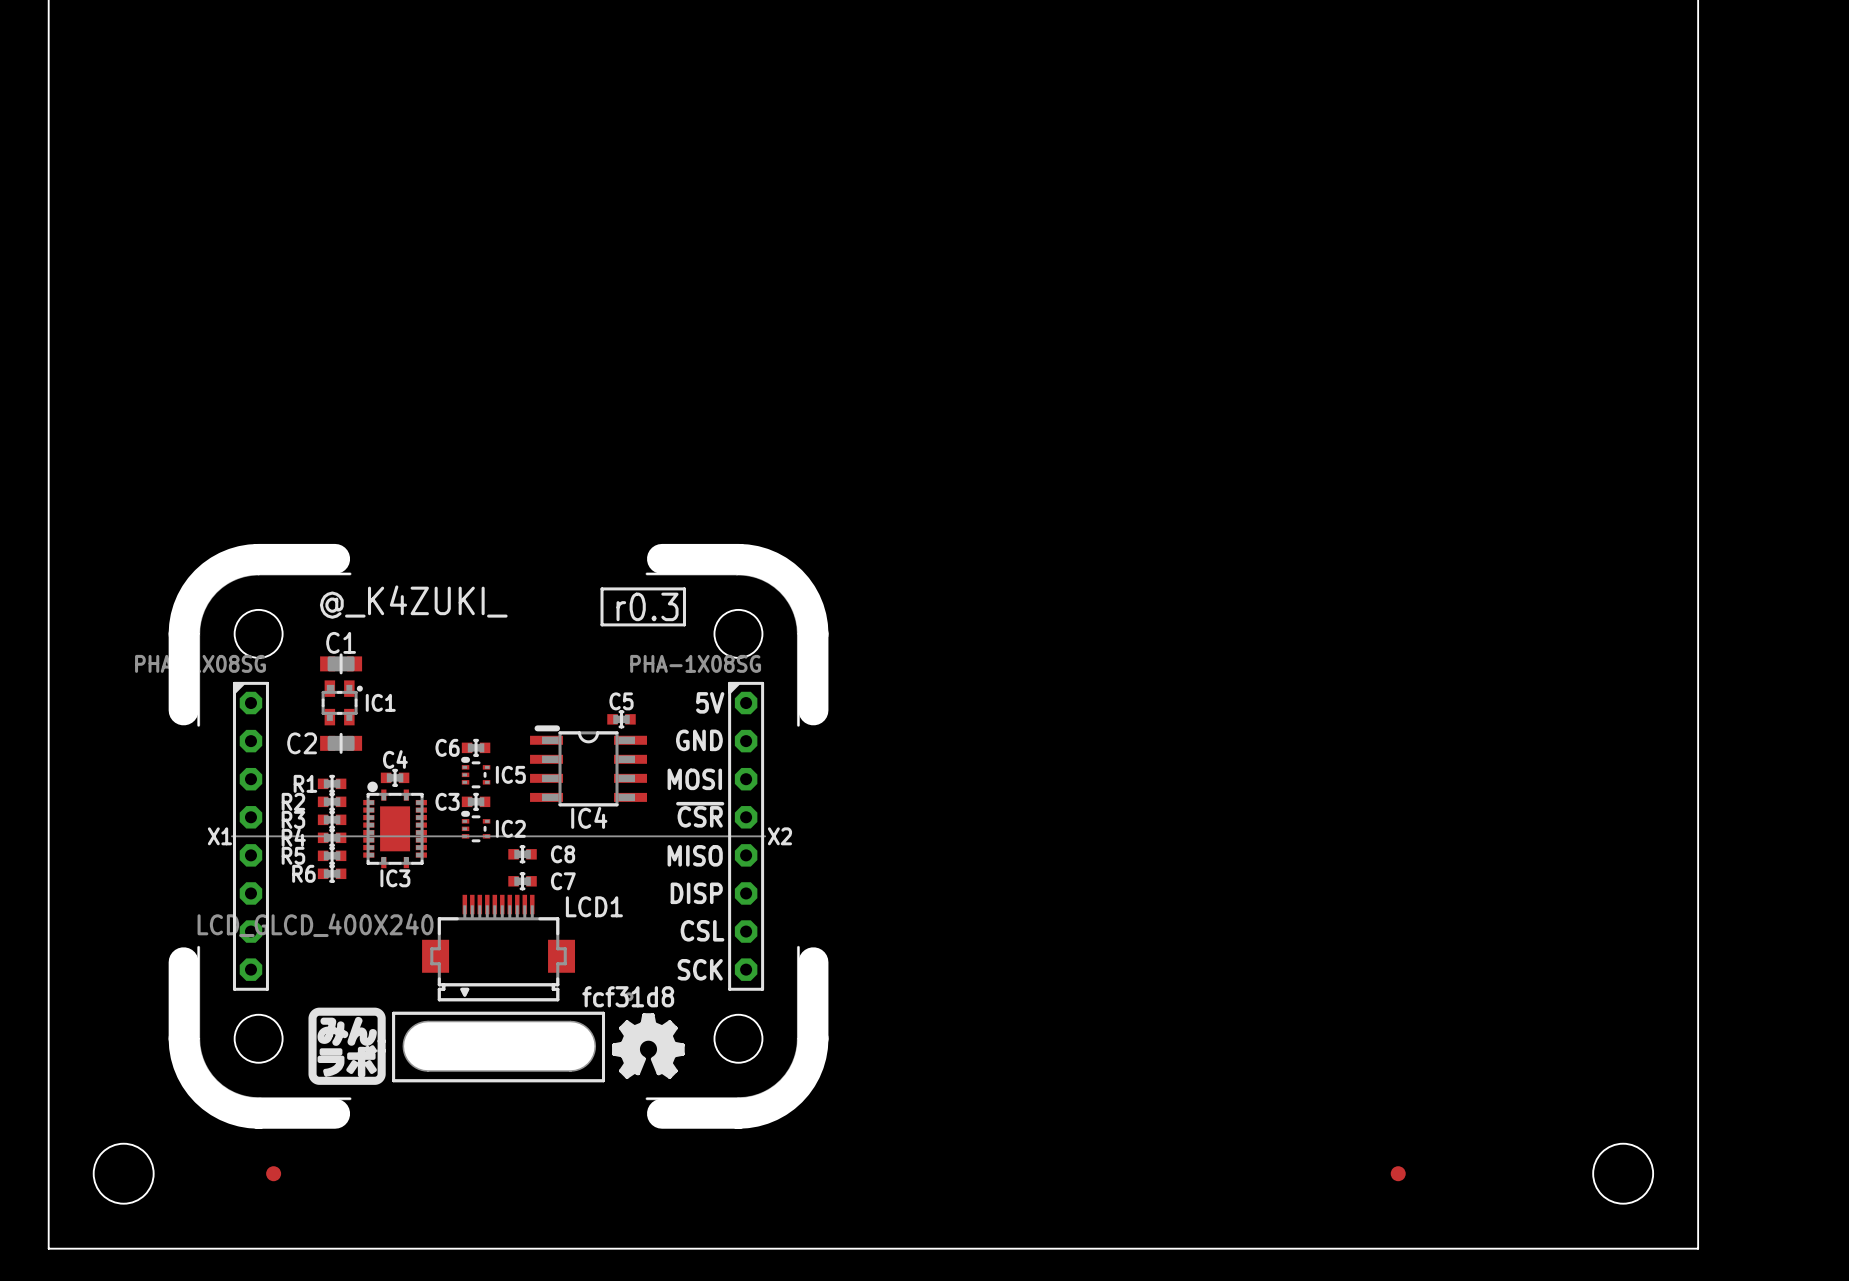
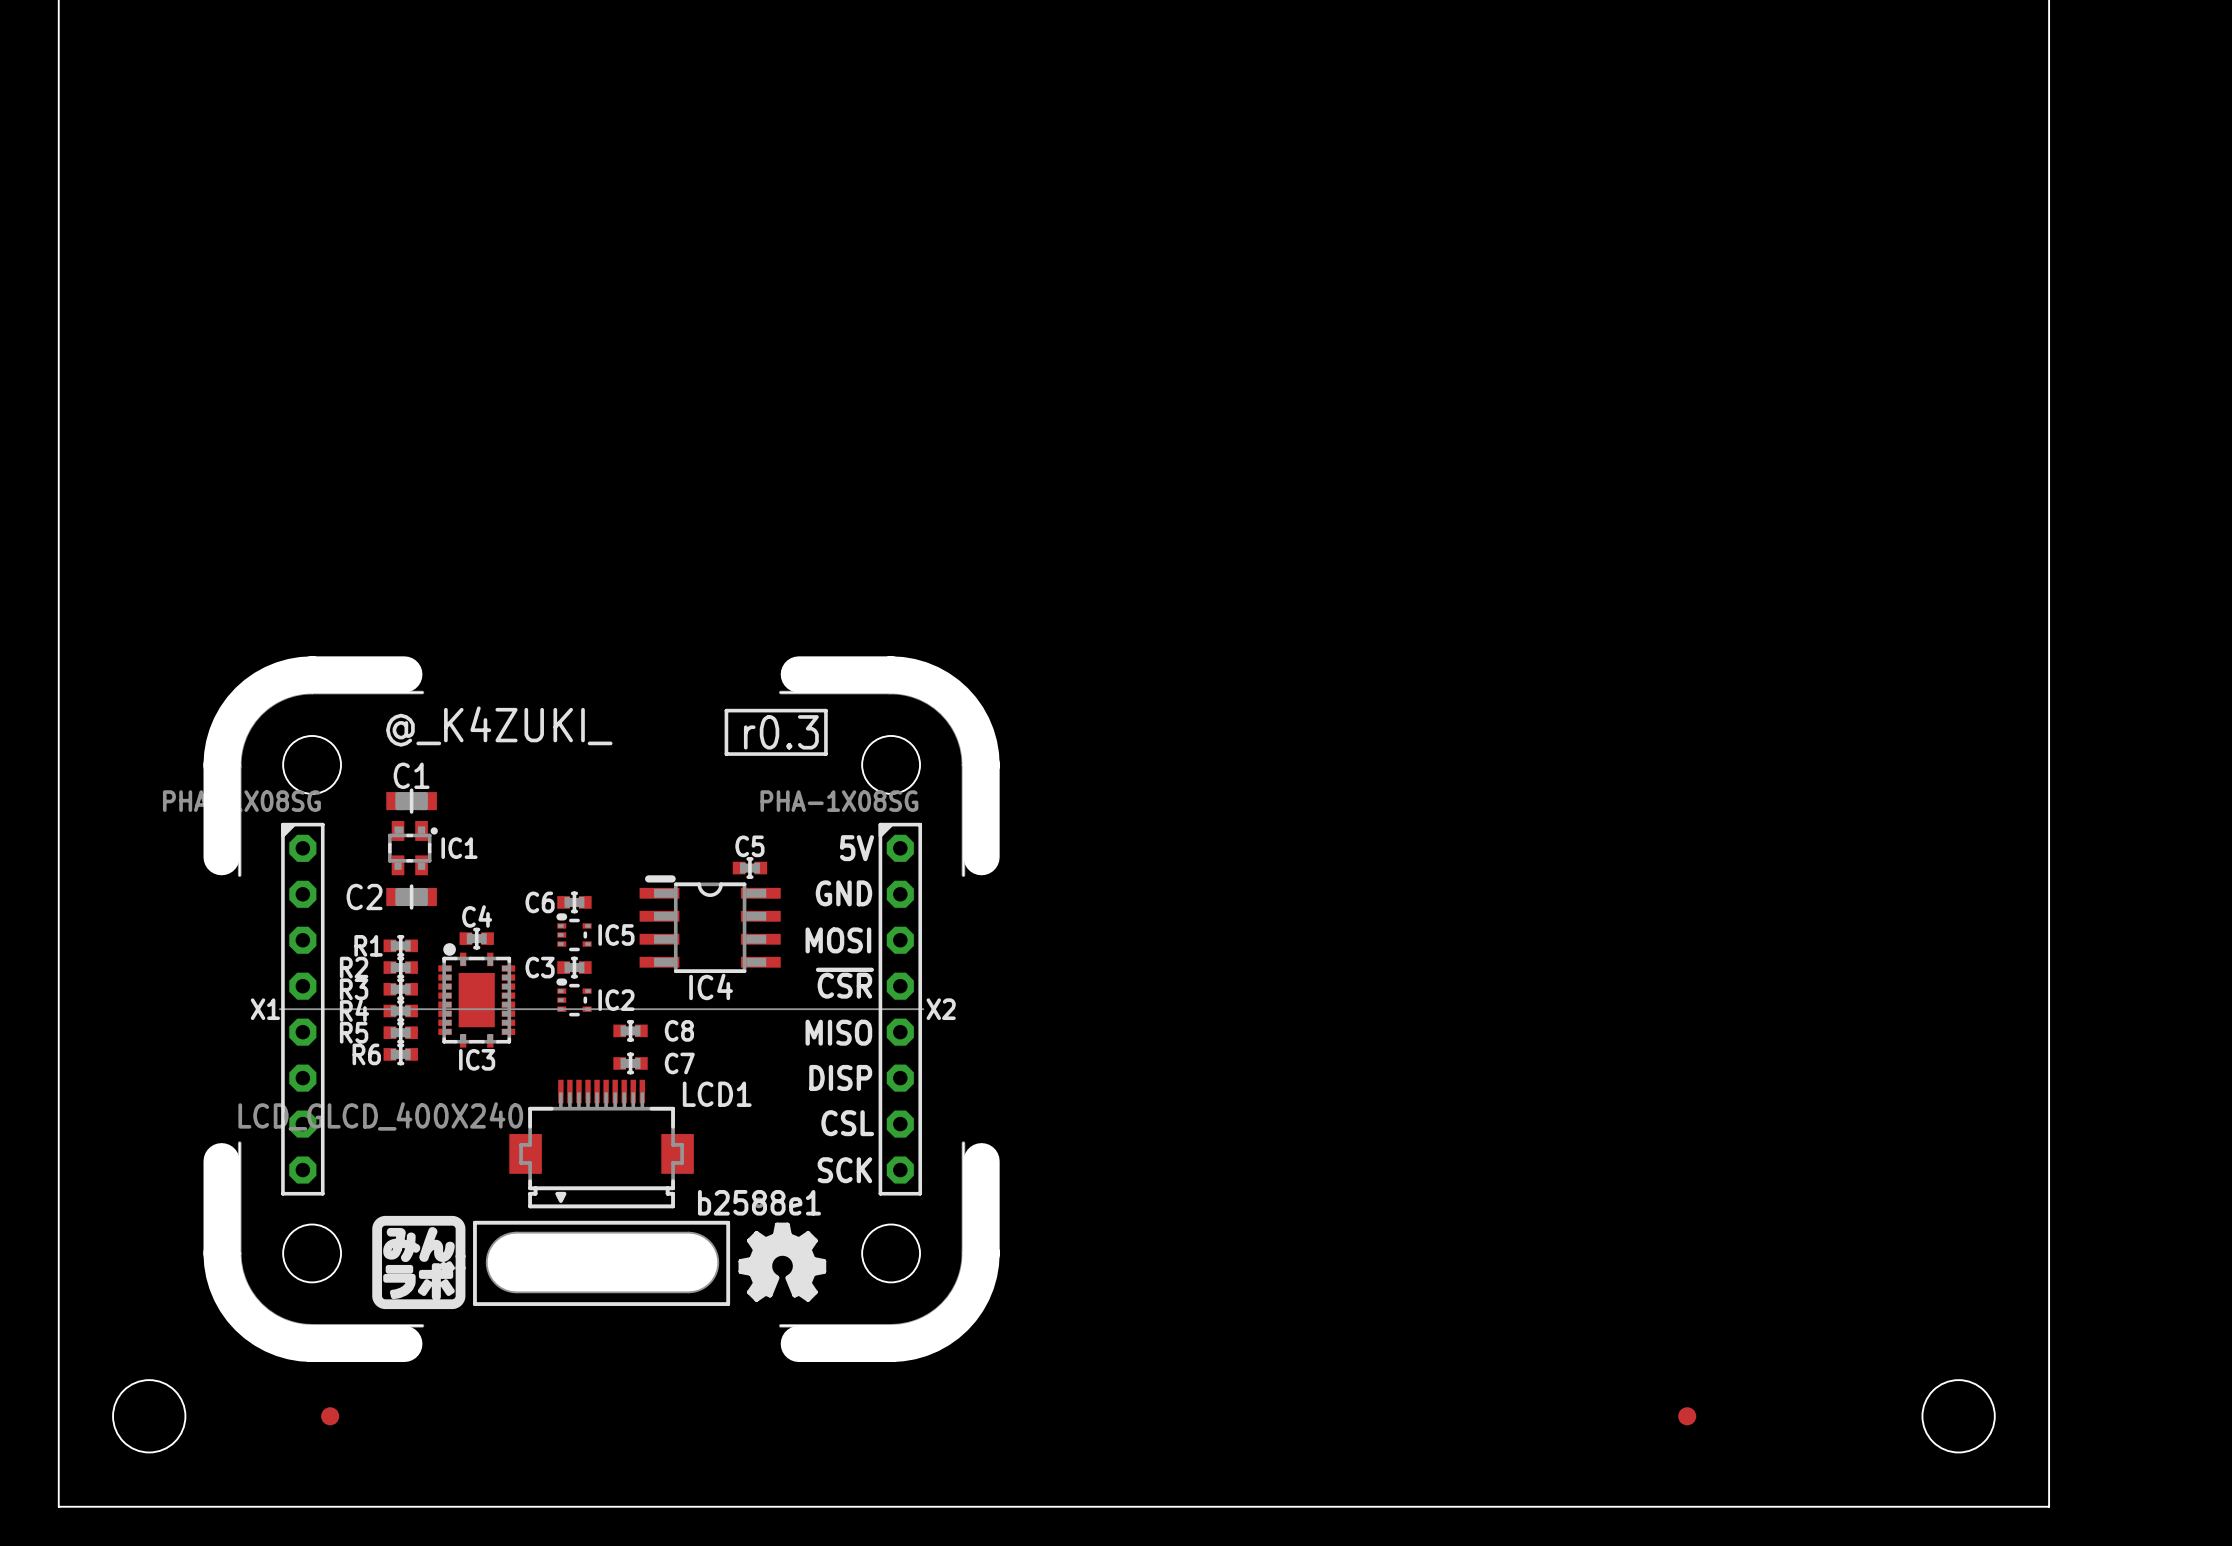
drawing shape: [582, 986, 675, 1008] -> [697, 1189, 821, 1216]

